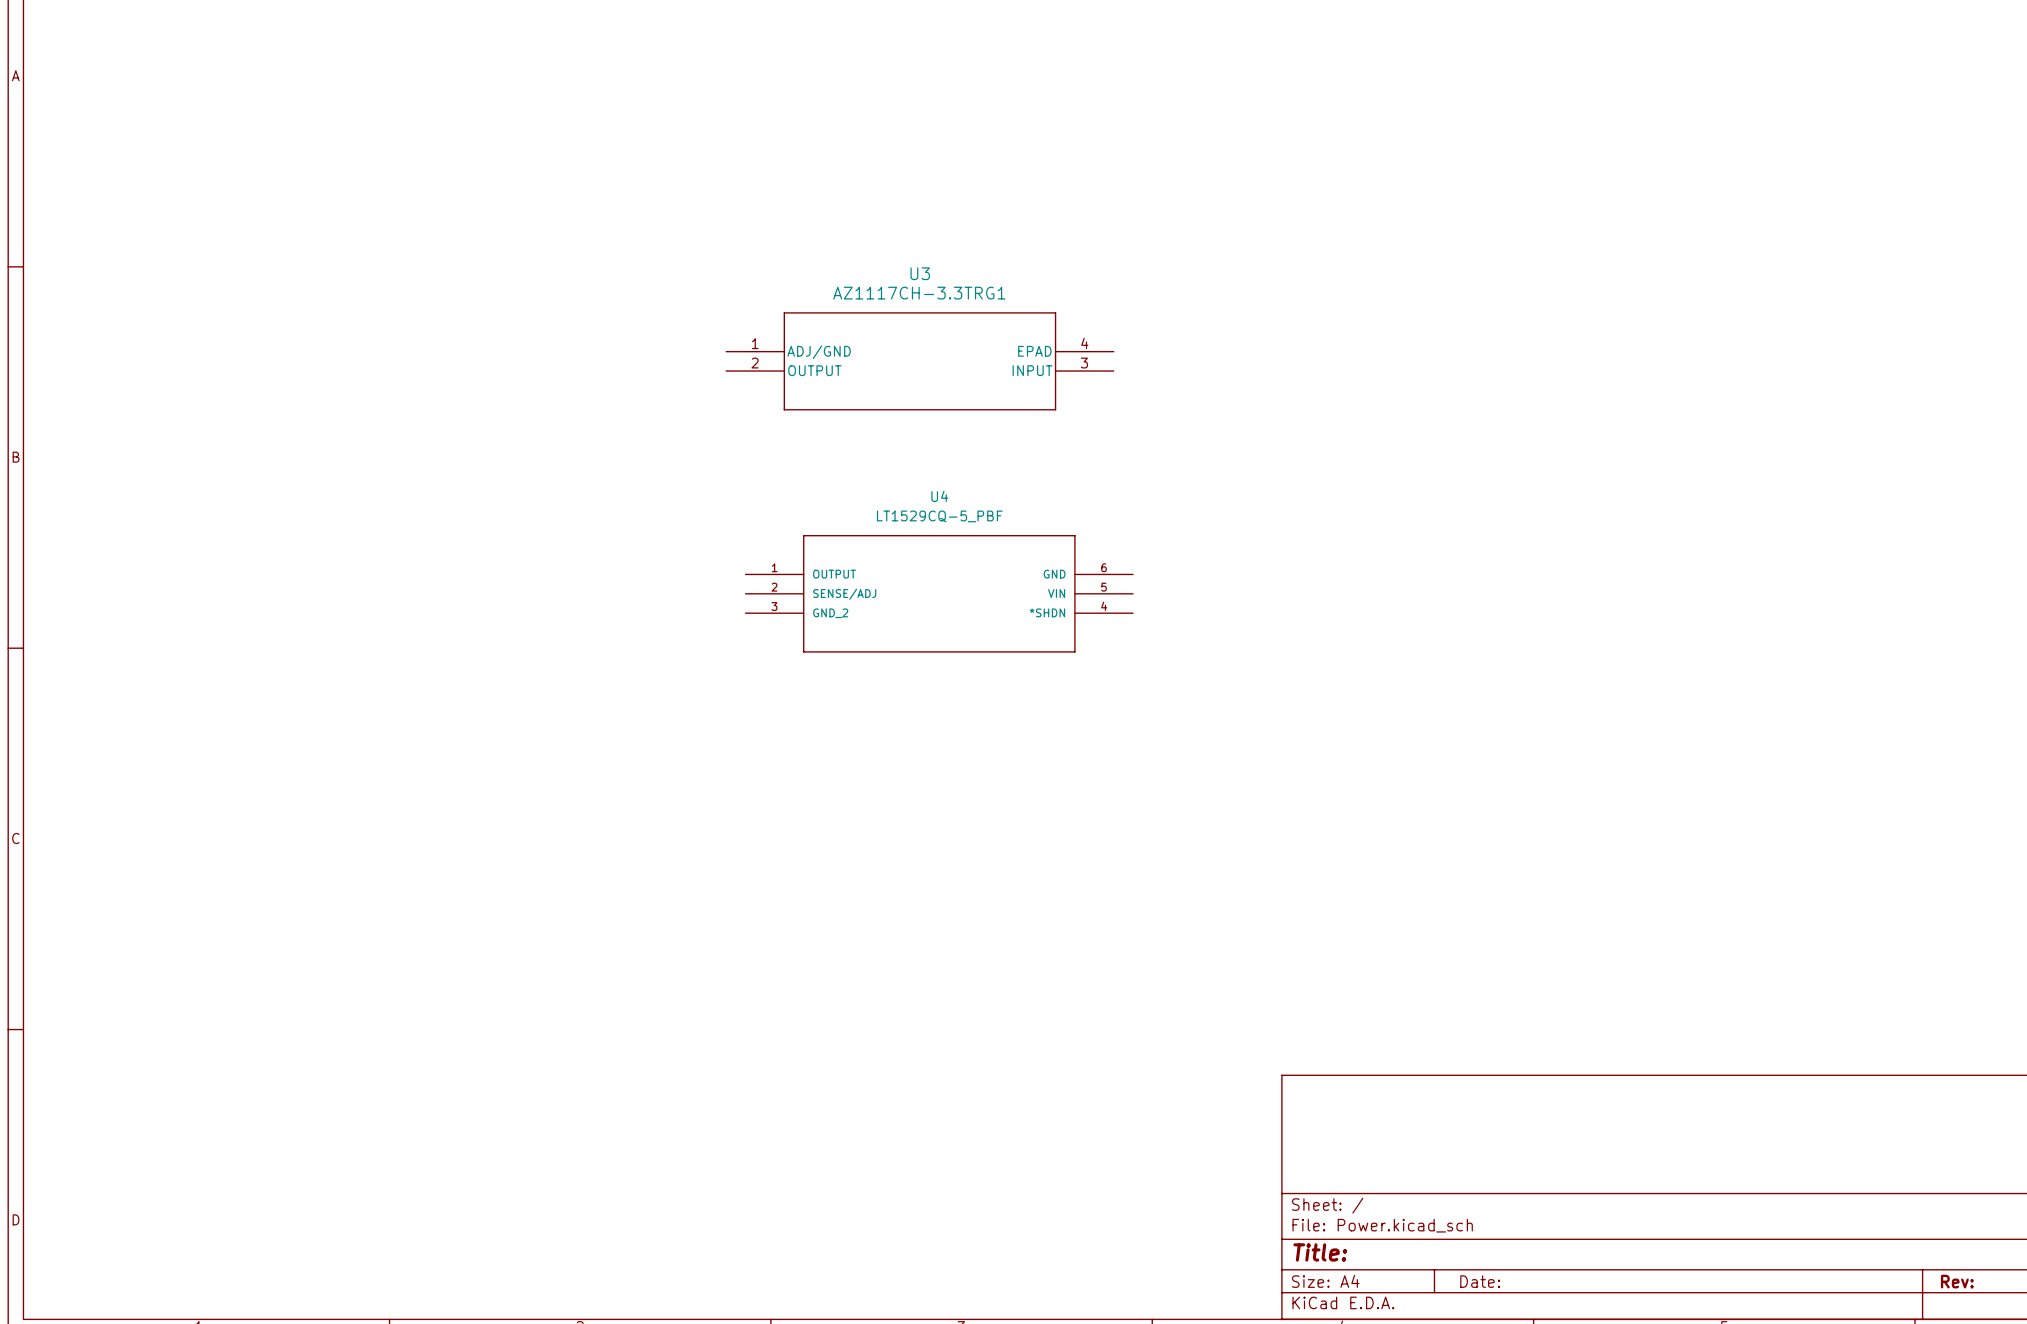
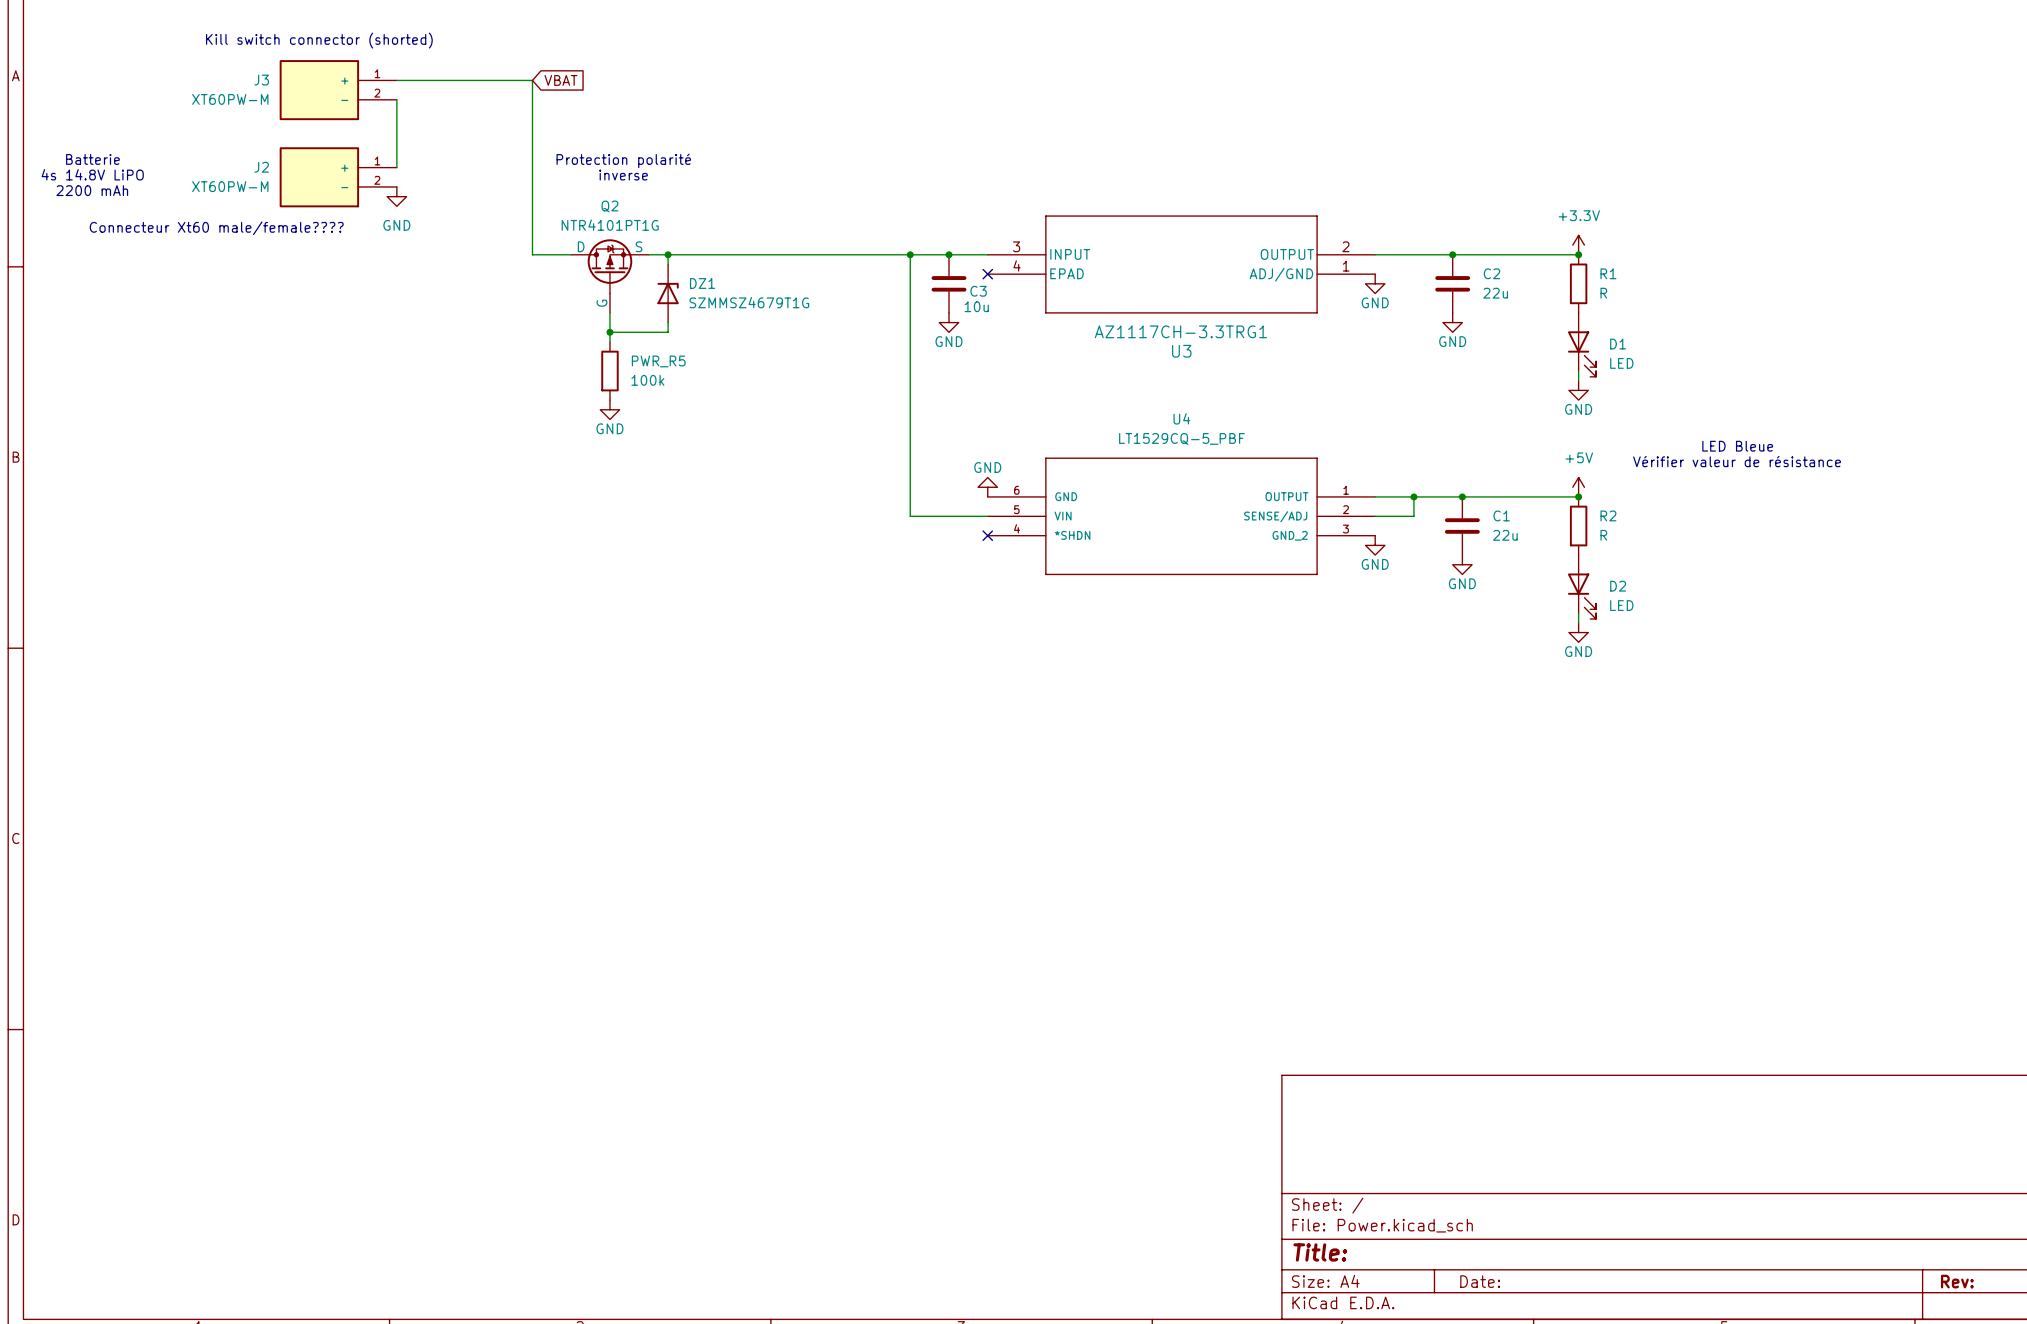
text: none -> Kill switch connector (shorted) (319, 40)
wire: none -> (396, 80) (532, 80) (532, 254) (571, 254)
global label: none -> VBAT (560, 80)
J3: none -> XT60PW-M (338, 90)
wire: none -> (396, 99) (396, 167)
text: none -> Batterie (92, 159)
text: none -> Protection polarité (623, 160)
text: none -> 4s 14.8V LiPO (92, 174)
text: none -> inverse (623, 175)
J2: none -> XT60PW-M (338, 177)
text: none -> 2200 mAh (92, 190)
power symbol: none -> GND (396, 196)
text: none -> Connecteur Xt60 male/female???? (216, 228)
power symbol: none -> +3.3V (1578, 245)
wire: none -> (648, 254) (987, 254)
wire: none -> (668, 254) (668, 264)
junction: none -> (668, 254)
wire: none -> (910, 254) (910, 516) (987, 516)
junction: none -> (910, 254)
junction: none -> (949, 254)
wire: none -> (1375, 254) (1578, 254)
junction: none -> (1452, 254)
junction: none -> (1578, 254)
no-connect mark: none -> (987, 274)
Q2: none -> NTR4101PT1G (609, 276)
C3: none -> 10u (949, 283)
power symbol: none -> GND (1375, 283)
C2: none -> 22u (1452, 283)
R1: none -> R (1578, 283)
DZ1: none -> SZMMSZ4679T1G (668, 293)
wire: none -> (609, 312) (609, 341)
wire: none -> (668, 322) (668, 332) (609, 332)
power symbol: none -> GND (949, 322)
power symbol: none -> GND (1452, 322)
junction: none -> (609, 332)
D1: none -> LED (1582, 344)
U3 rotation: 0° (919, 361) -> 180° (1181, 264)
U3 position: (919, 361) -> (1181, 264)
PWR_R5: none -> 100k (609, 371)
wire: none -> (1578, 371) (1578, 380)
power symbol: none -> GND (1578, 390)
power symbol: none -> GND (609, 409)
text: none -> LED Bleue (1737, 446)
text: none -> Vérifier valeur de résistance (1737, 461)
power symbol: none -> GND (987, 487)
power symbol: none -> +5V (1578, 487)
wire: none -> (1375, 496) (1578, 496)
wire: none -> (1413, 496) (1413, 516) (1375, 516)
junction: none -> (1413, 496)
junction: none -> (1462, 496)
junction: none -> (1578, 496)
C1: none -> 22u (1462, 526)
R2: none -> R (1578, 526)
no-connect mark: none -> (987, 535)
power symbol: none -> GND (1375, 545)
power symbol: none -> GND (1462, 564)
D2: none -> LED (1582, 587)
U4 flip: as is (939, 593) -> left-right (1181, 516)
U4 position: (939, 593) -> (1181, 516)
wire: none -> (1578, 613) (1578, 622)
power symbol: none -> GND (1578, 632)

